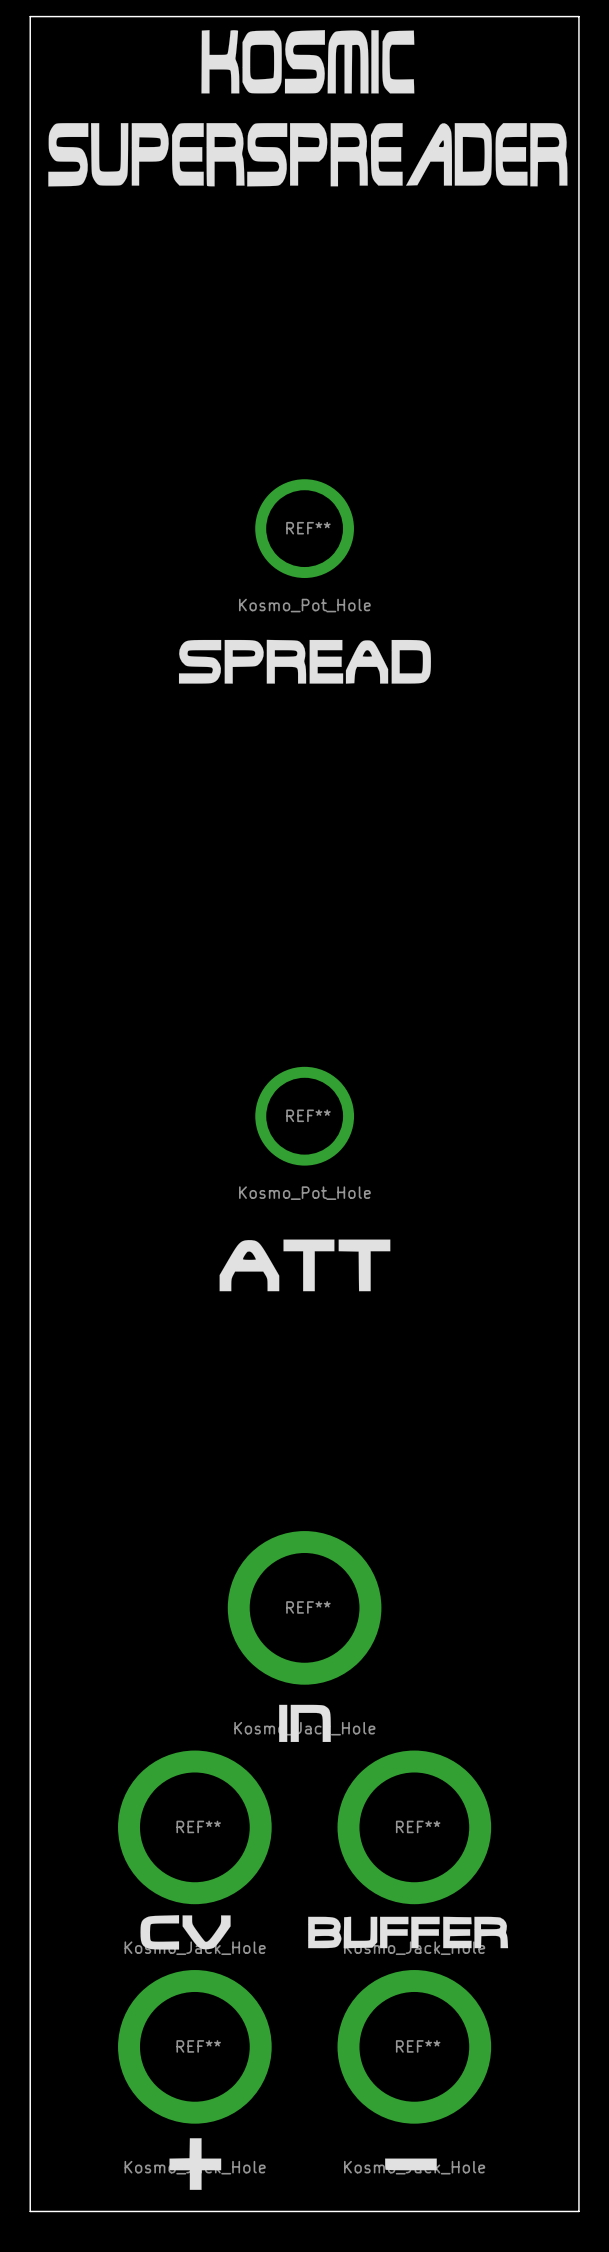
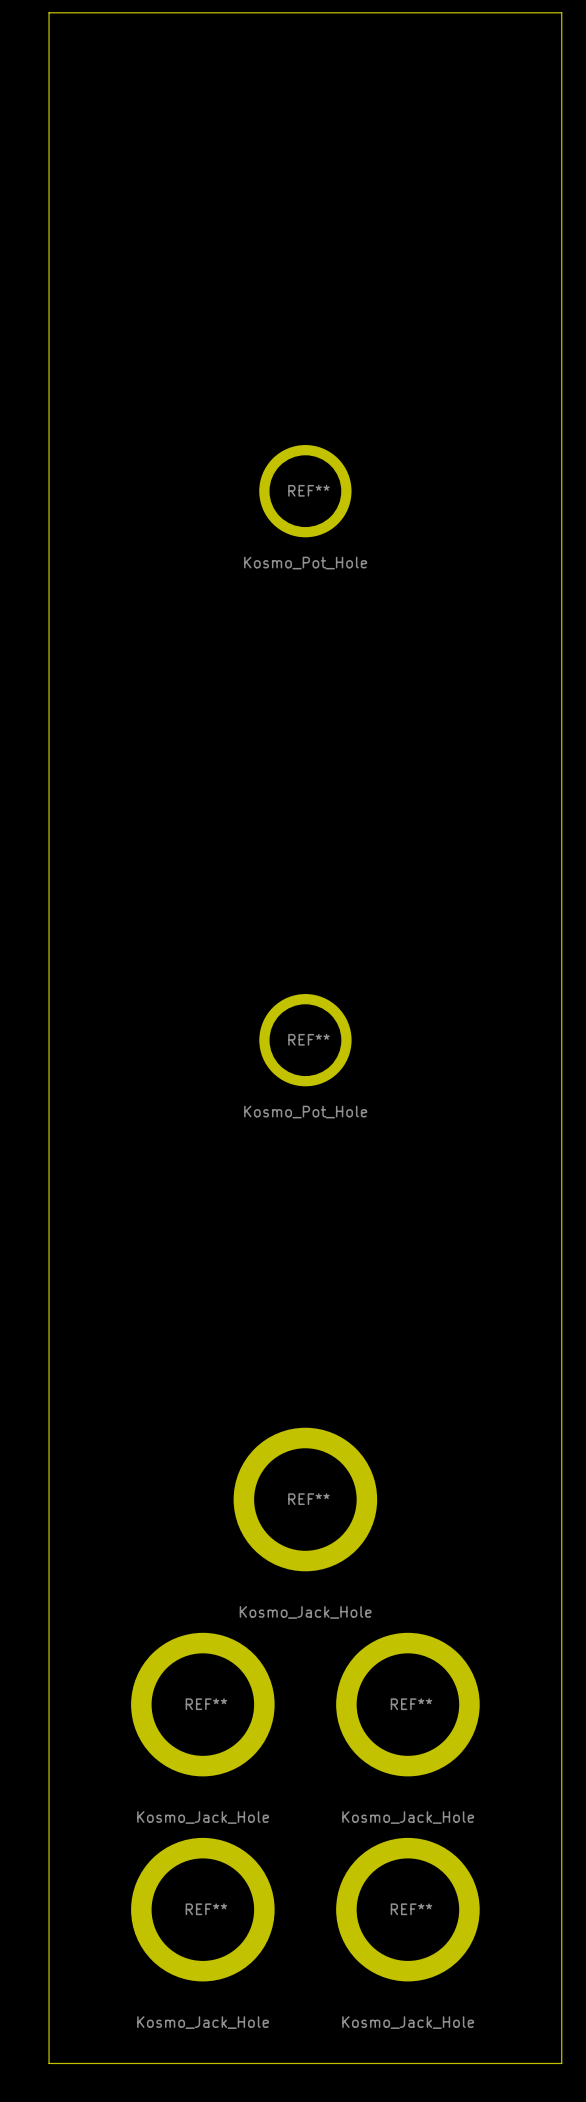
drawing: [48, 30, 568, 2190] -> none

